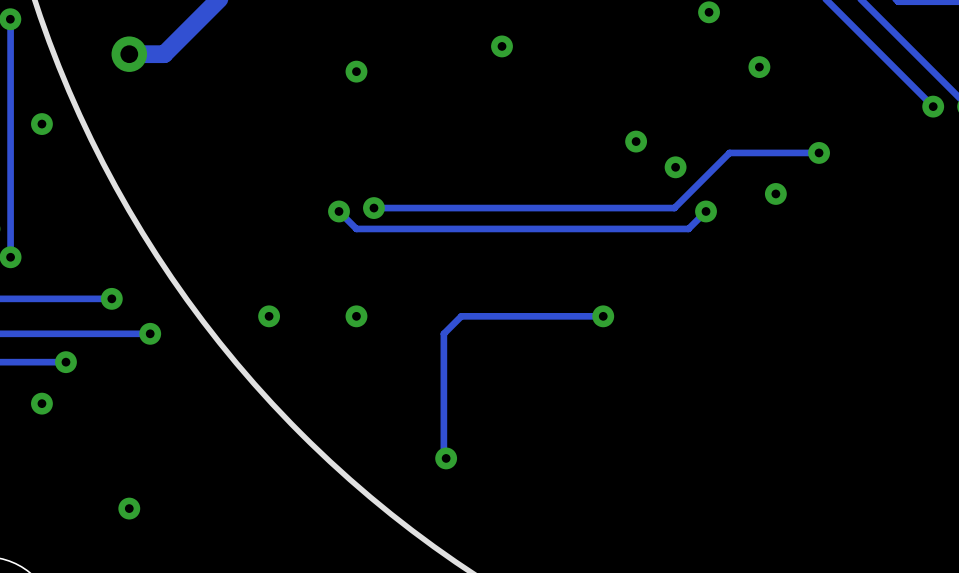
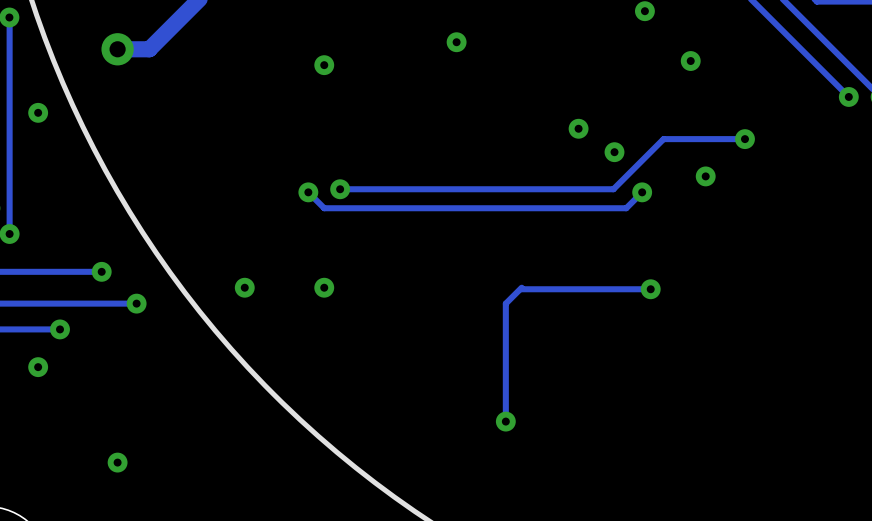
track: none -> (521, 287) (505, 303) (505, 421)
track: (603, 316) (461, 316) (443, 333) (443, 456) (446, 458) -> none
via: (603, 316) -> none
track: none -> (650, 289) (521, 289)
via: none -> (650, 289)
via: (446, 458) -> none
via: none -> (505, 421)

